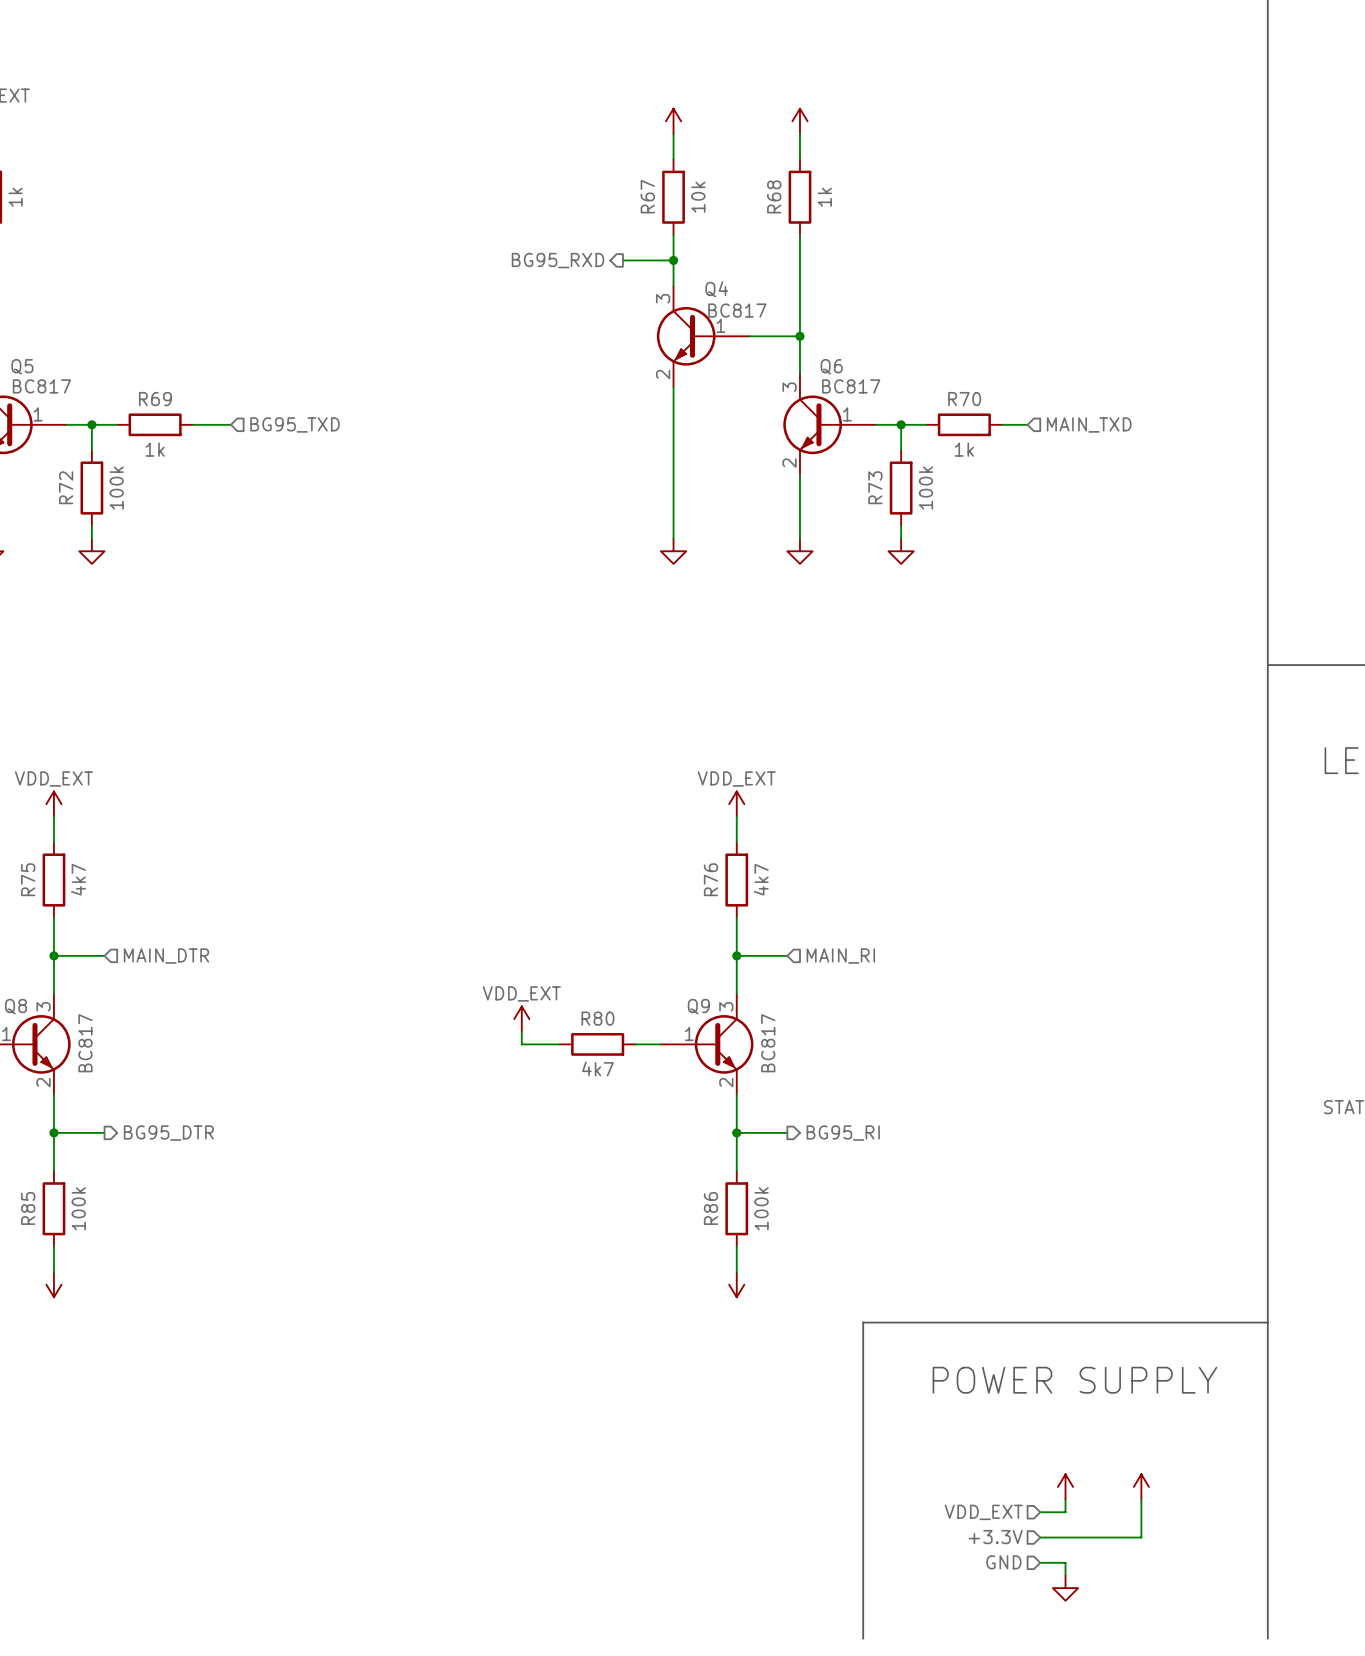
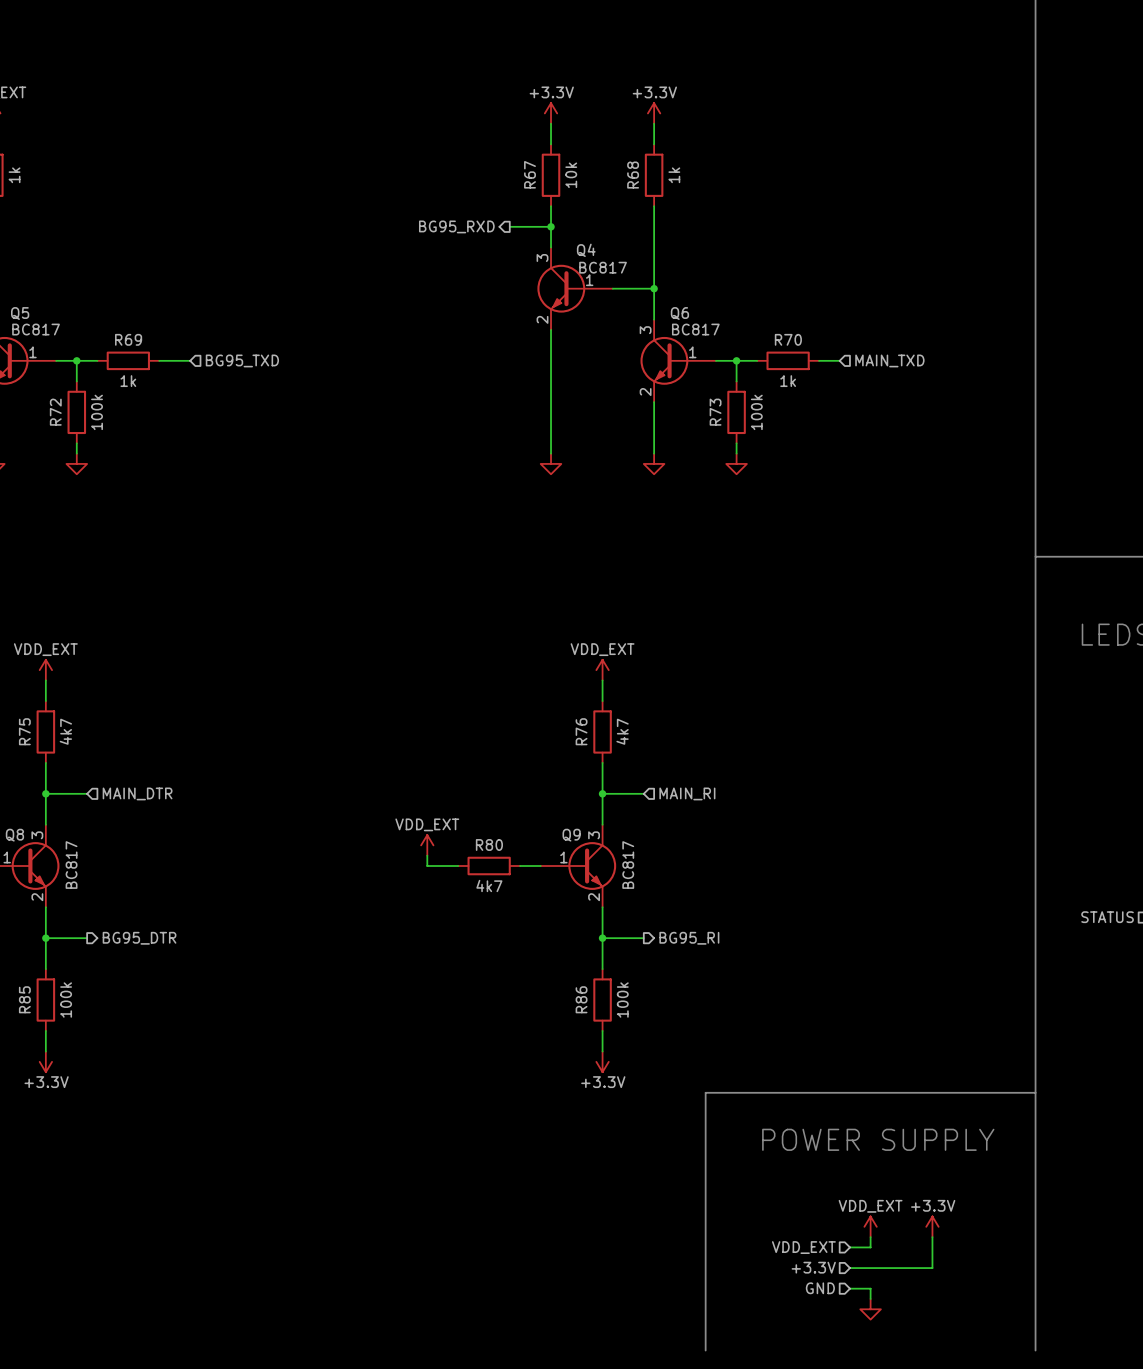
power symbol text: none -> +3.3V (551, 92)
power symbol text: none -> +3.3V (654, 92)
power symbol text: none -> +3.3V (46, 1082)
power symbol text: none -> +3.3V (603, 1082)
power symbol text: none -> VDD_EXT (870, 1206)
power symbol text: none -> +3.3V (933, 1205)

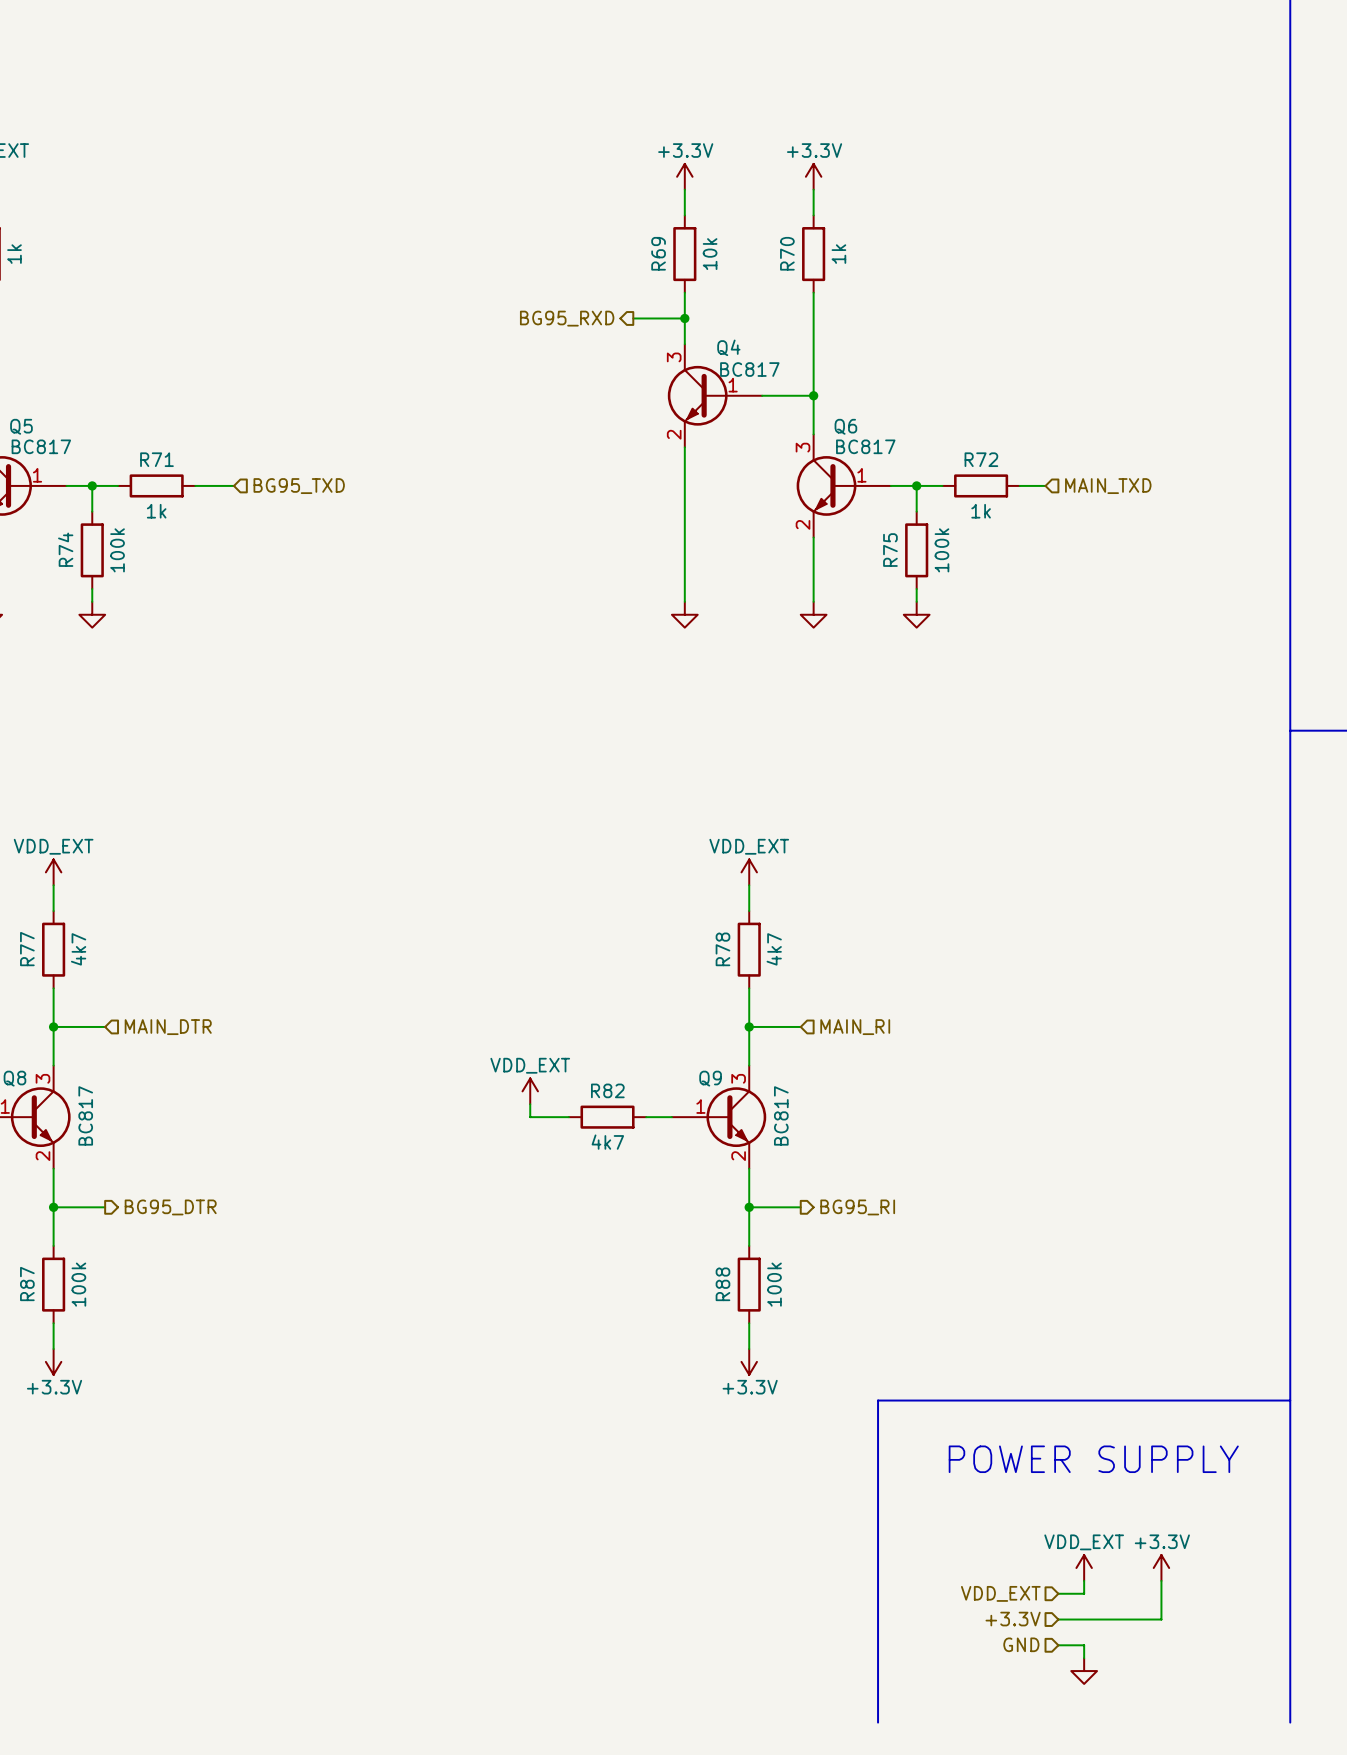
R67 name: R67 (530, 174) -> R69 (658, 253)
R68 name: R68 (633, 175) -> R70 (787, 253)
R69 name: R69 (128, 339) -> R71 (156, 459)
R70 name: R70 (788, 339) -> R72 (981, 459)
R72 name: R72 (55, 412) -> R74 (65, 549)
R73 name: R73 (715, 412) -> R75 (890, 550)
R75 name: R75 (24, 731) -> R77 (27, 949)
R76 name: R76 (581, 731) -> R78 (722, 949)
R80 name: R80 (489, 845) -> R82 (607, 1090)
R85 name: R85 (24, 999) -> R87 (27, 1283)
R86 name: R86 (581, 999) -> R88 (722, 1284)

